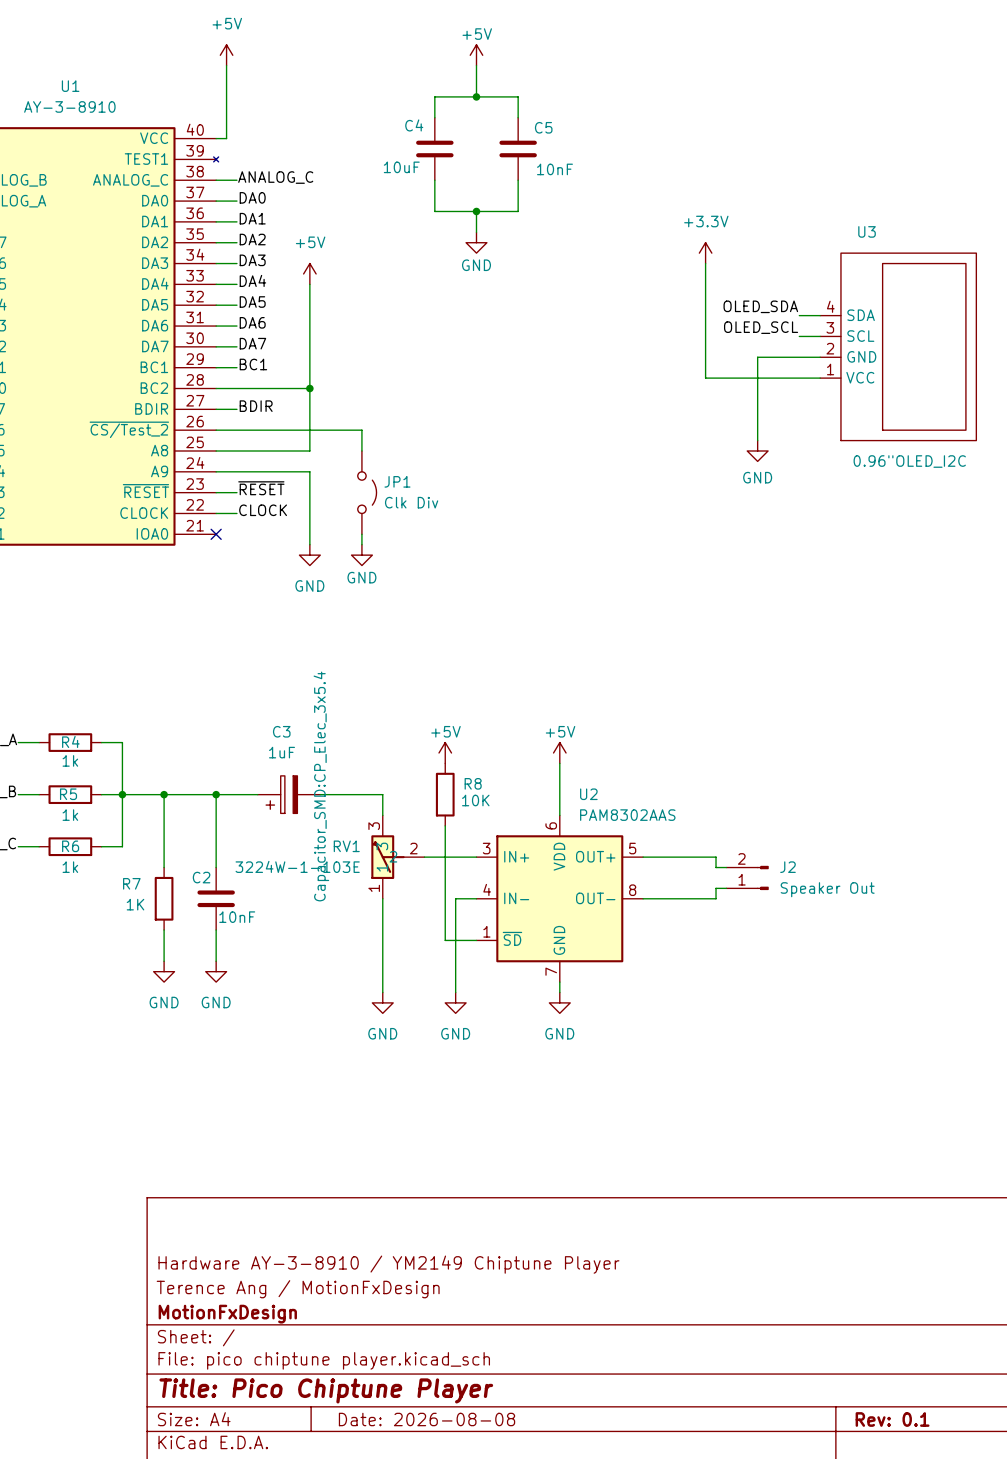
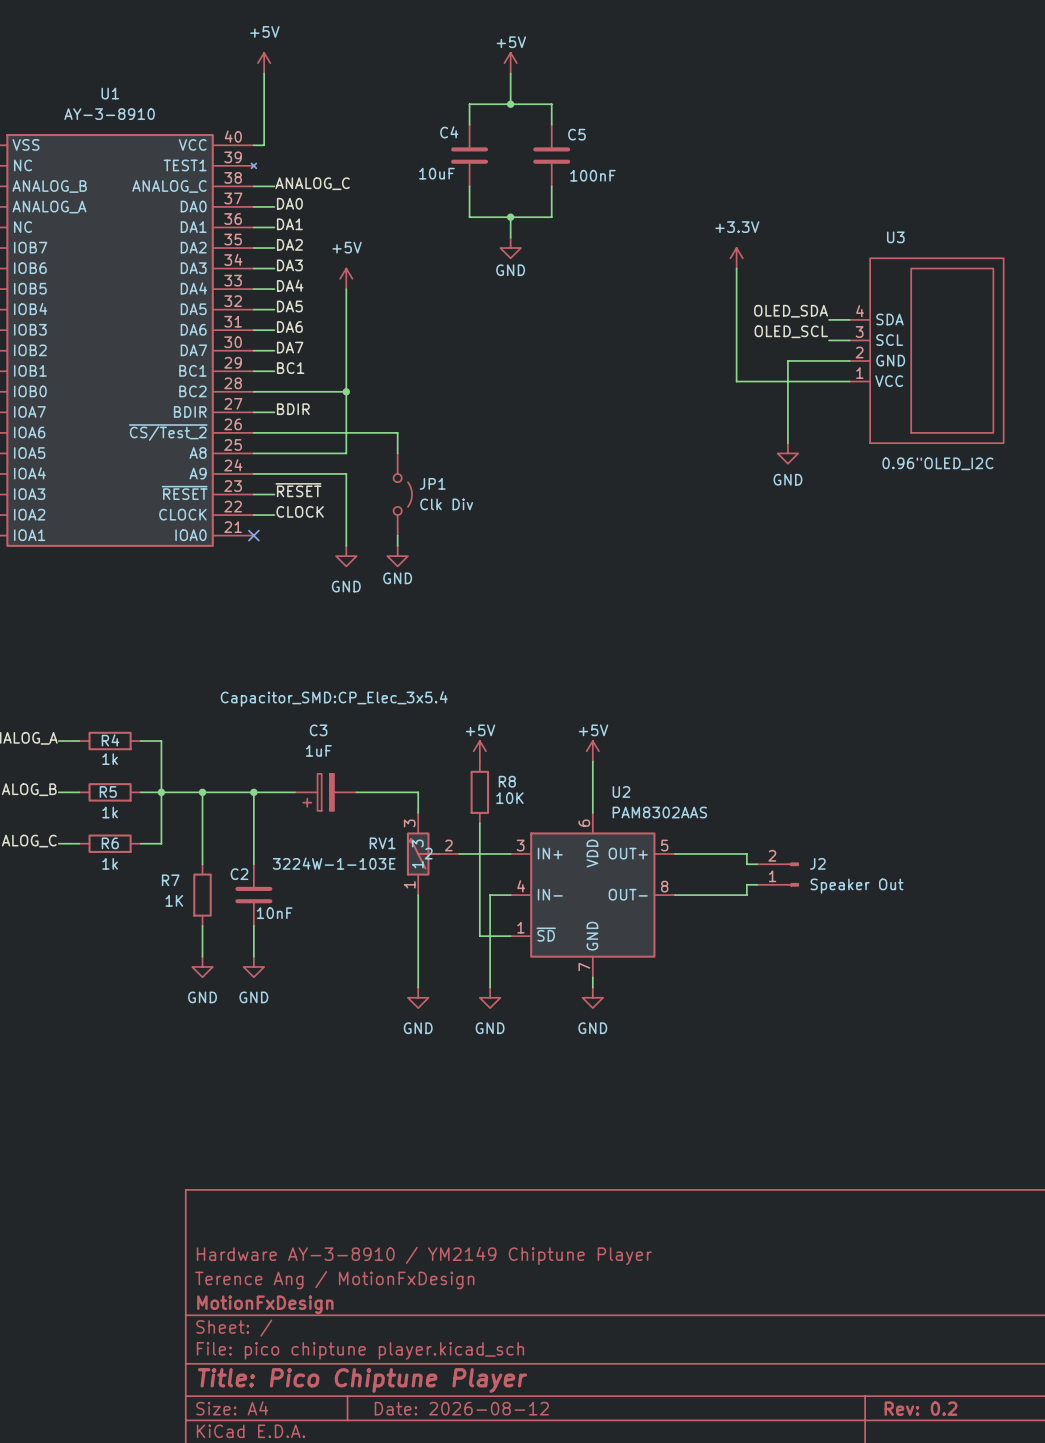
C5 value: 10nF (554, 169) -> 100nF (592, 175)
C3 text rotation: 0° (321, 786) -> 90° clockwise (334, 698)
title block: Date: 2026-08-08 (427, 1419) -> Date: 2026-08-12 (461, 1408)
title block: Rev: 0.1 (892, 1419) -> Rev: 0.2 (921, 1408)

